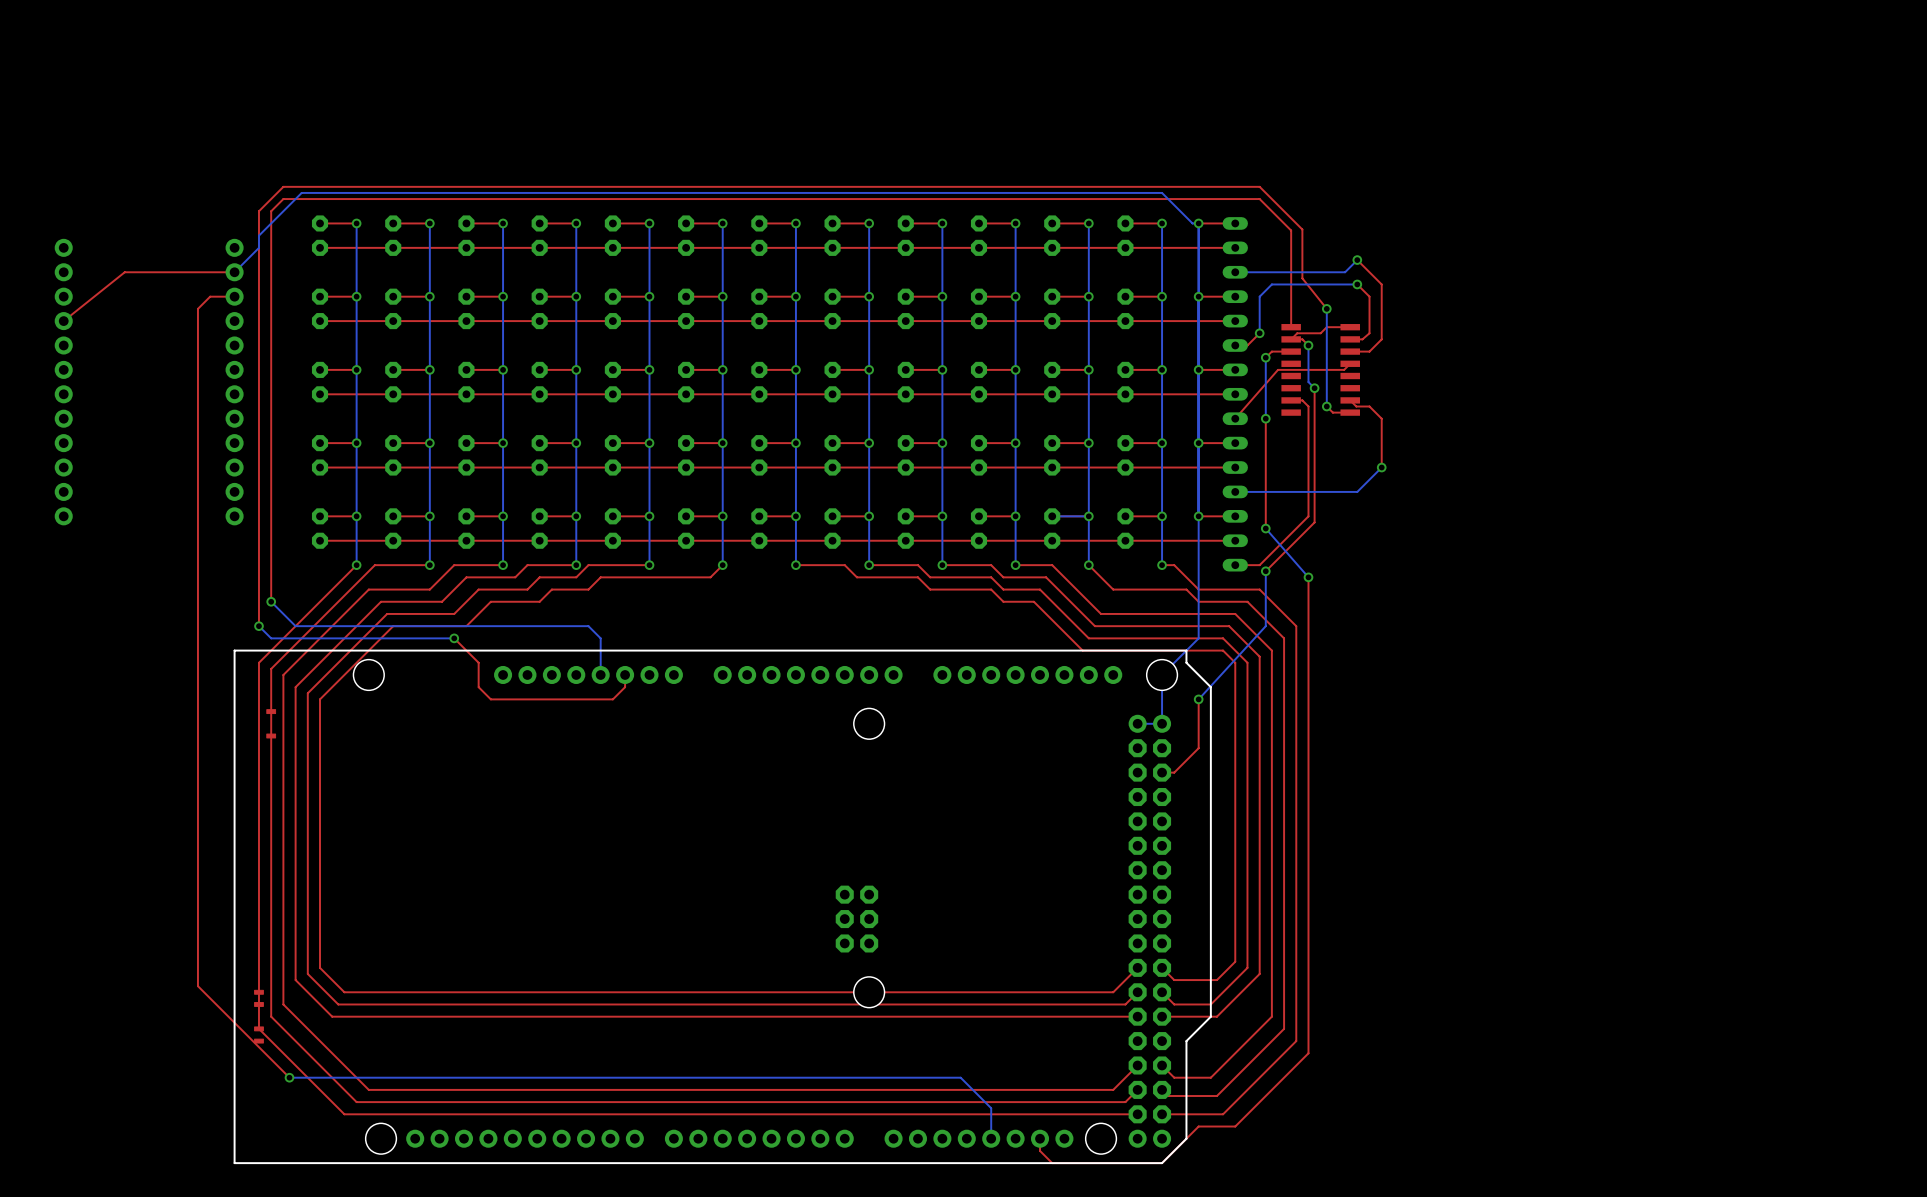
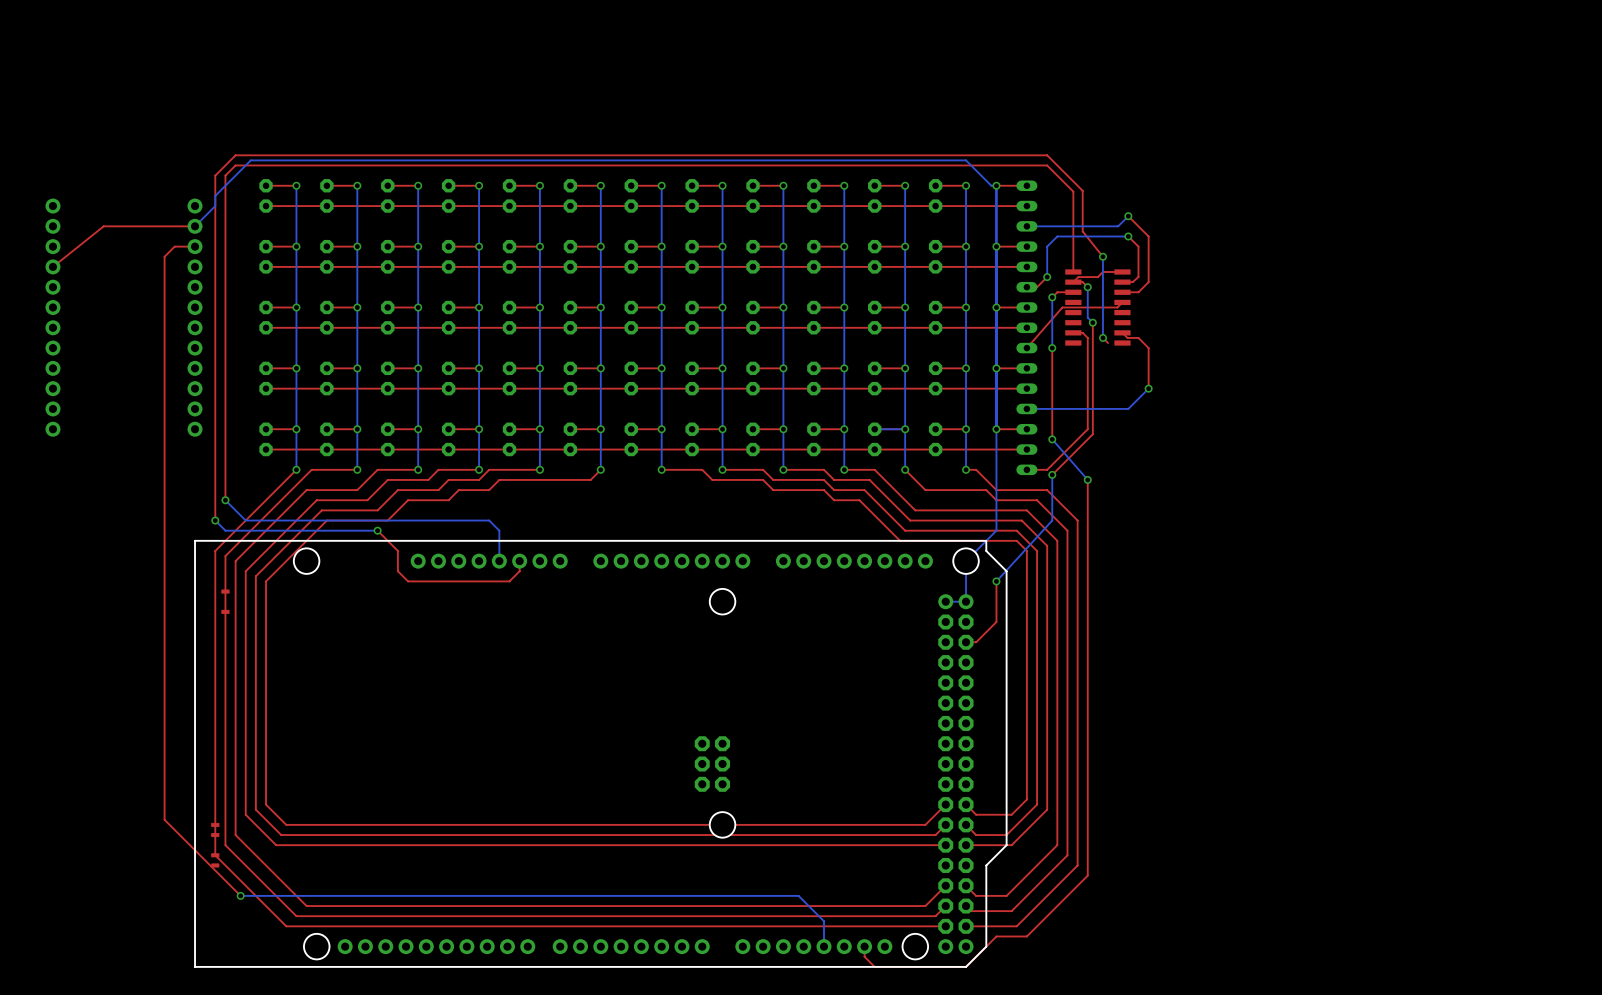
top track: (1350, 412) (1332, 412) -> none

